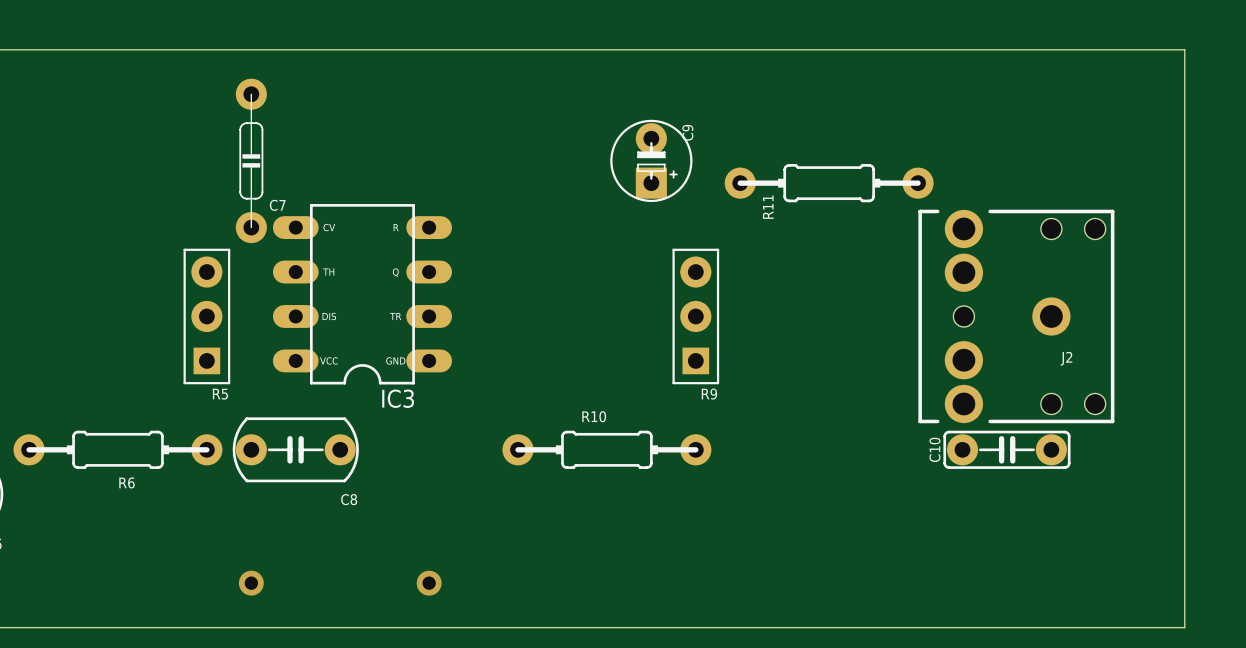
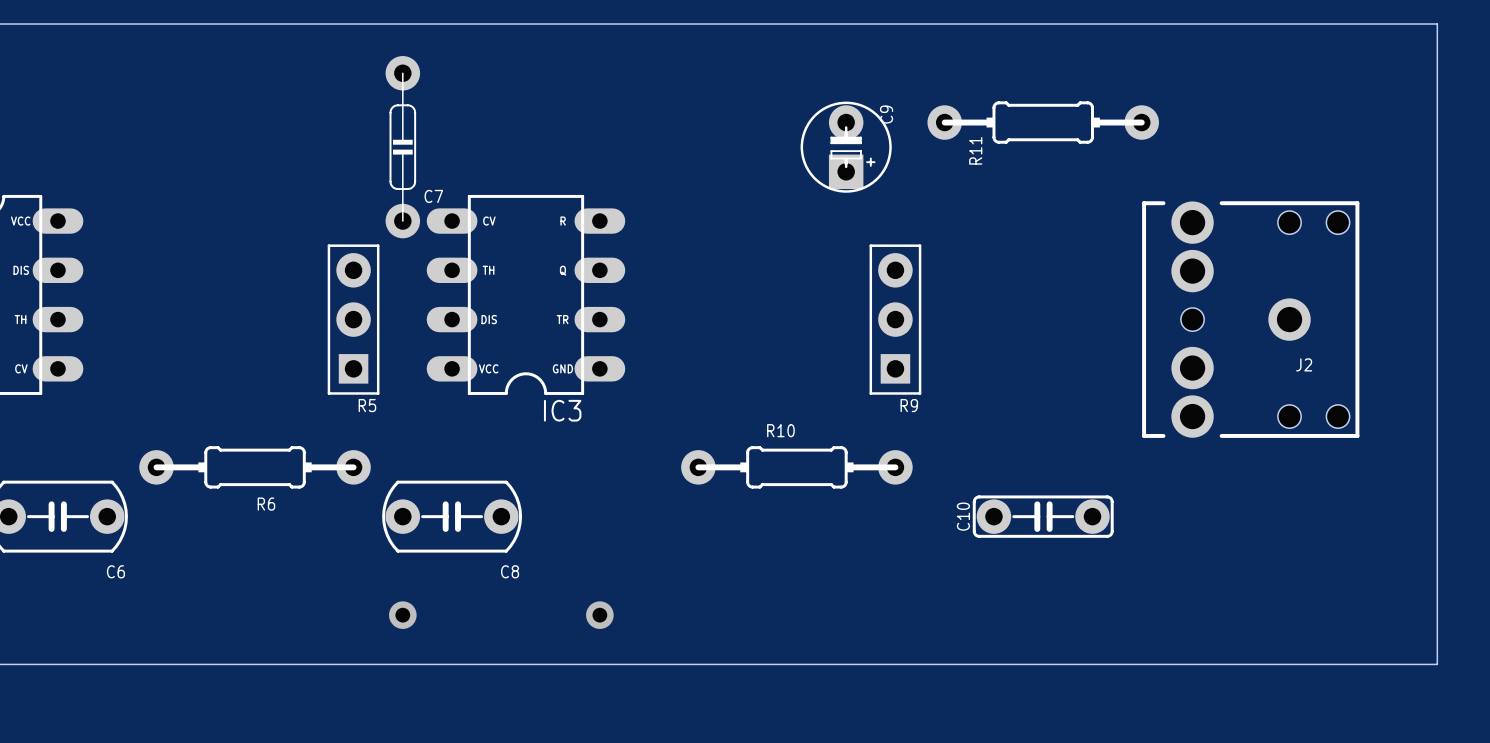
R11 position: (829, 183) -> (1043, 122)
C8 position: (295, 449) -> (452, 516)
C10 position: (1006, 449) -> (1043, 516)

